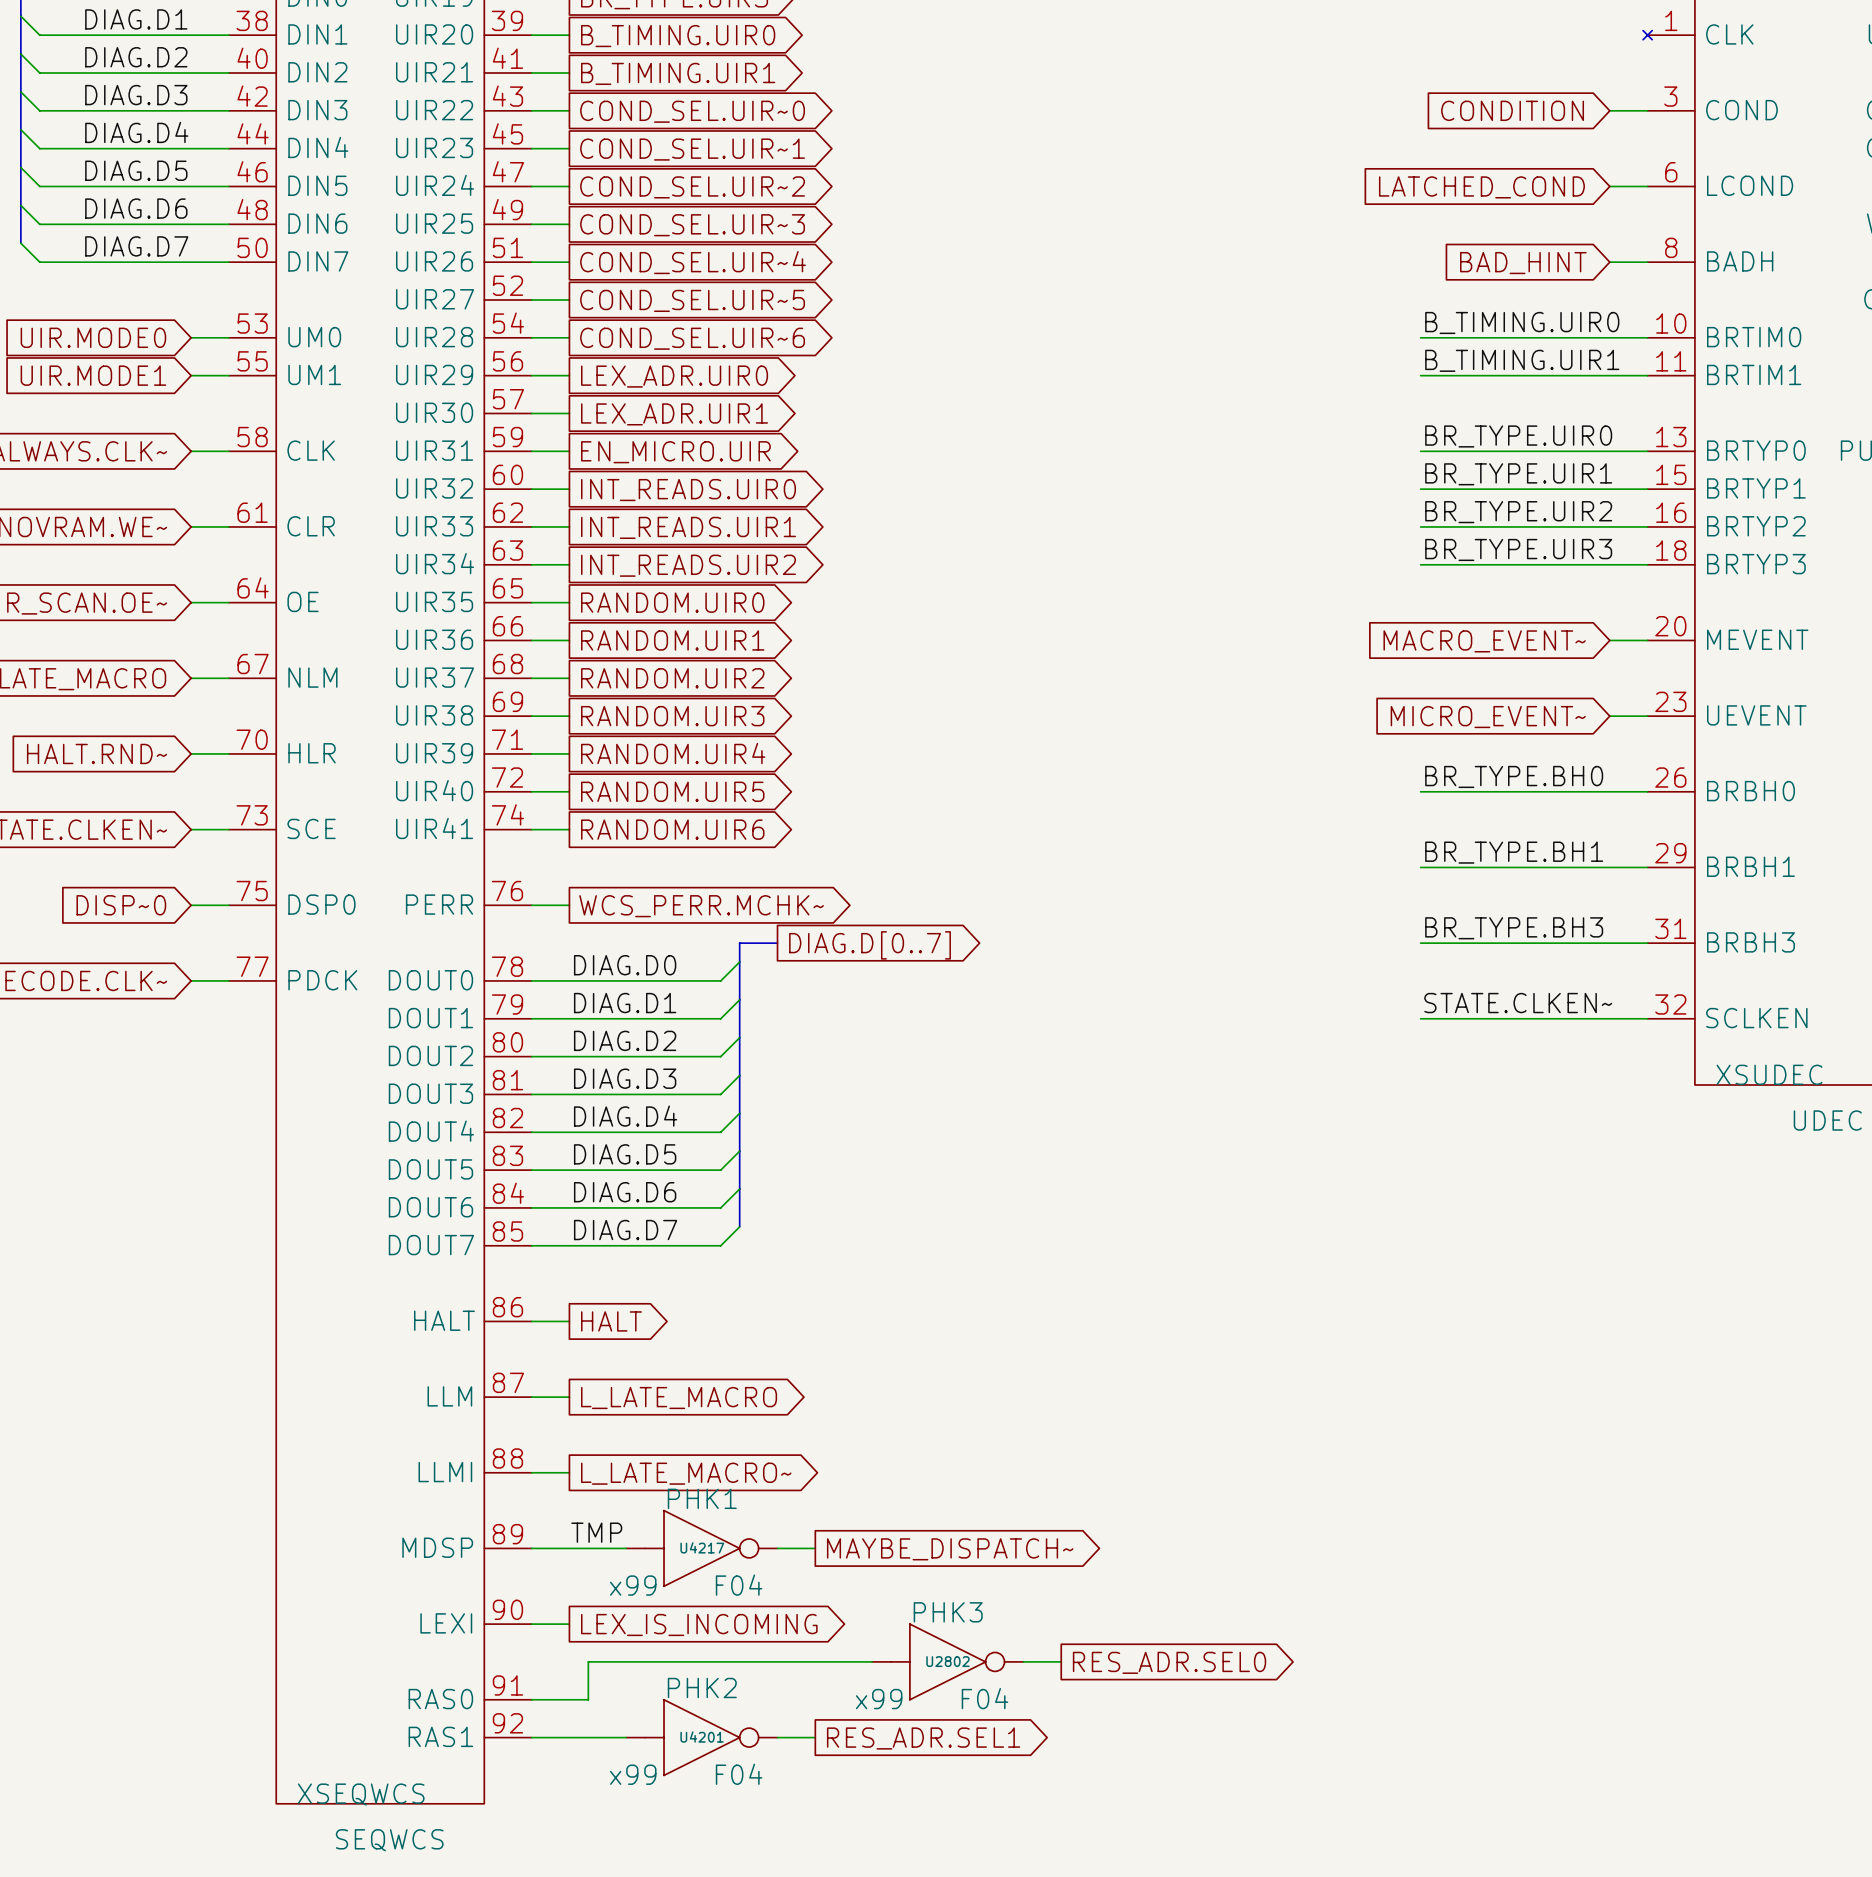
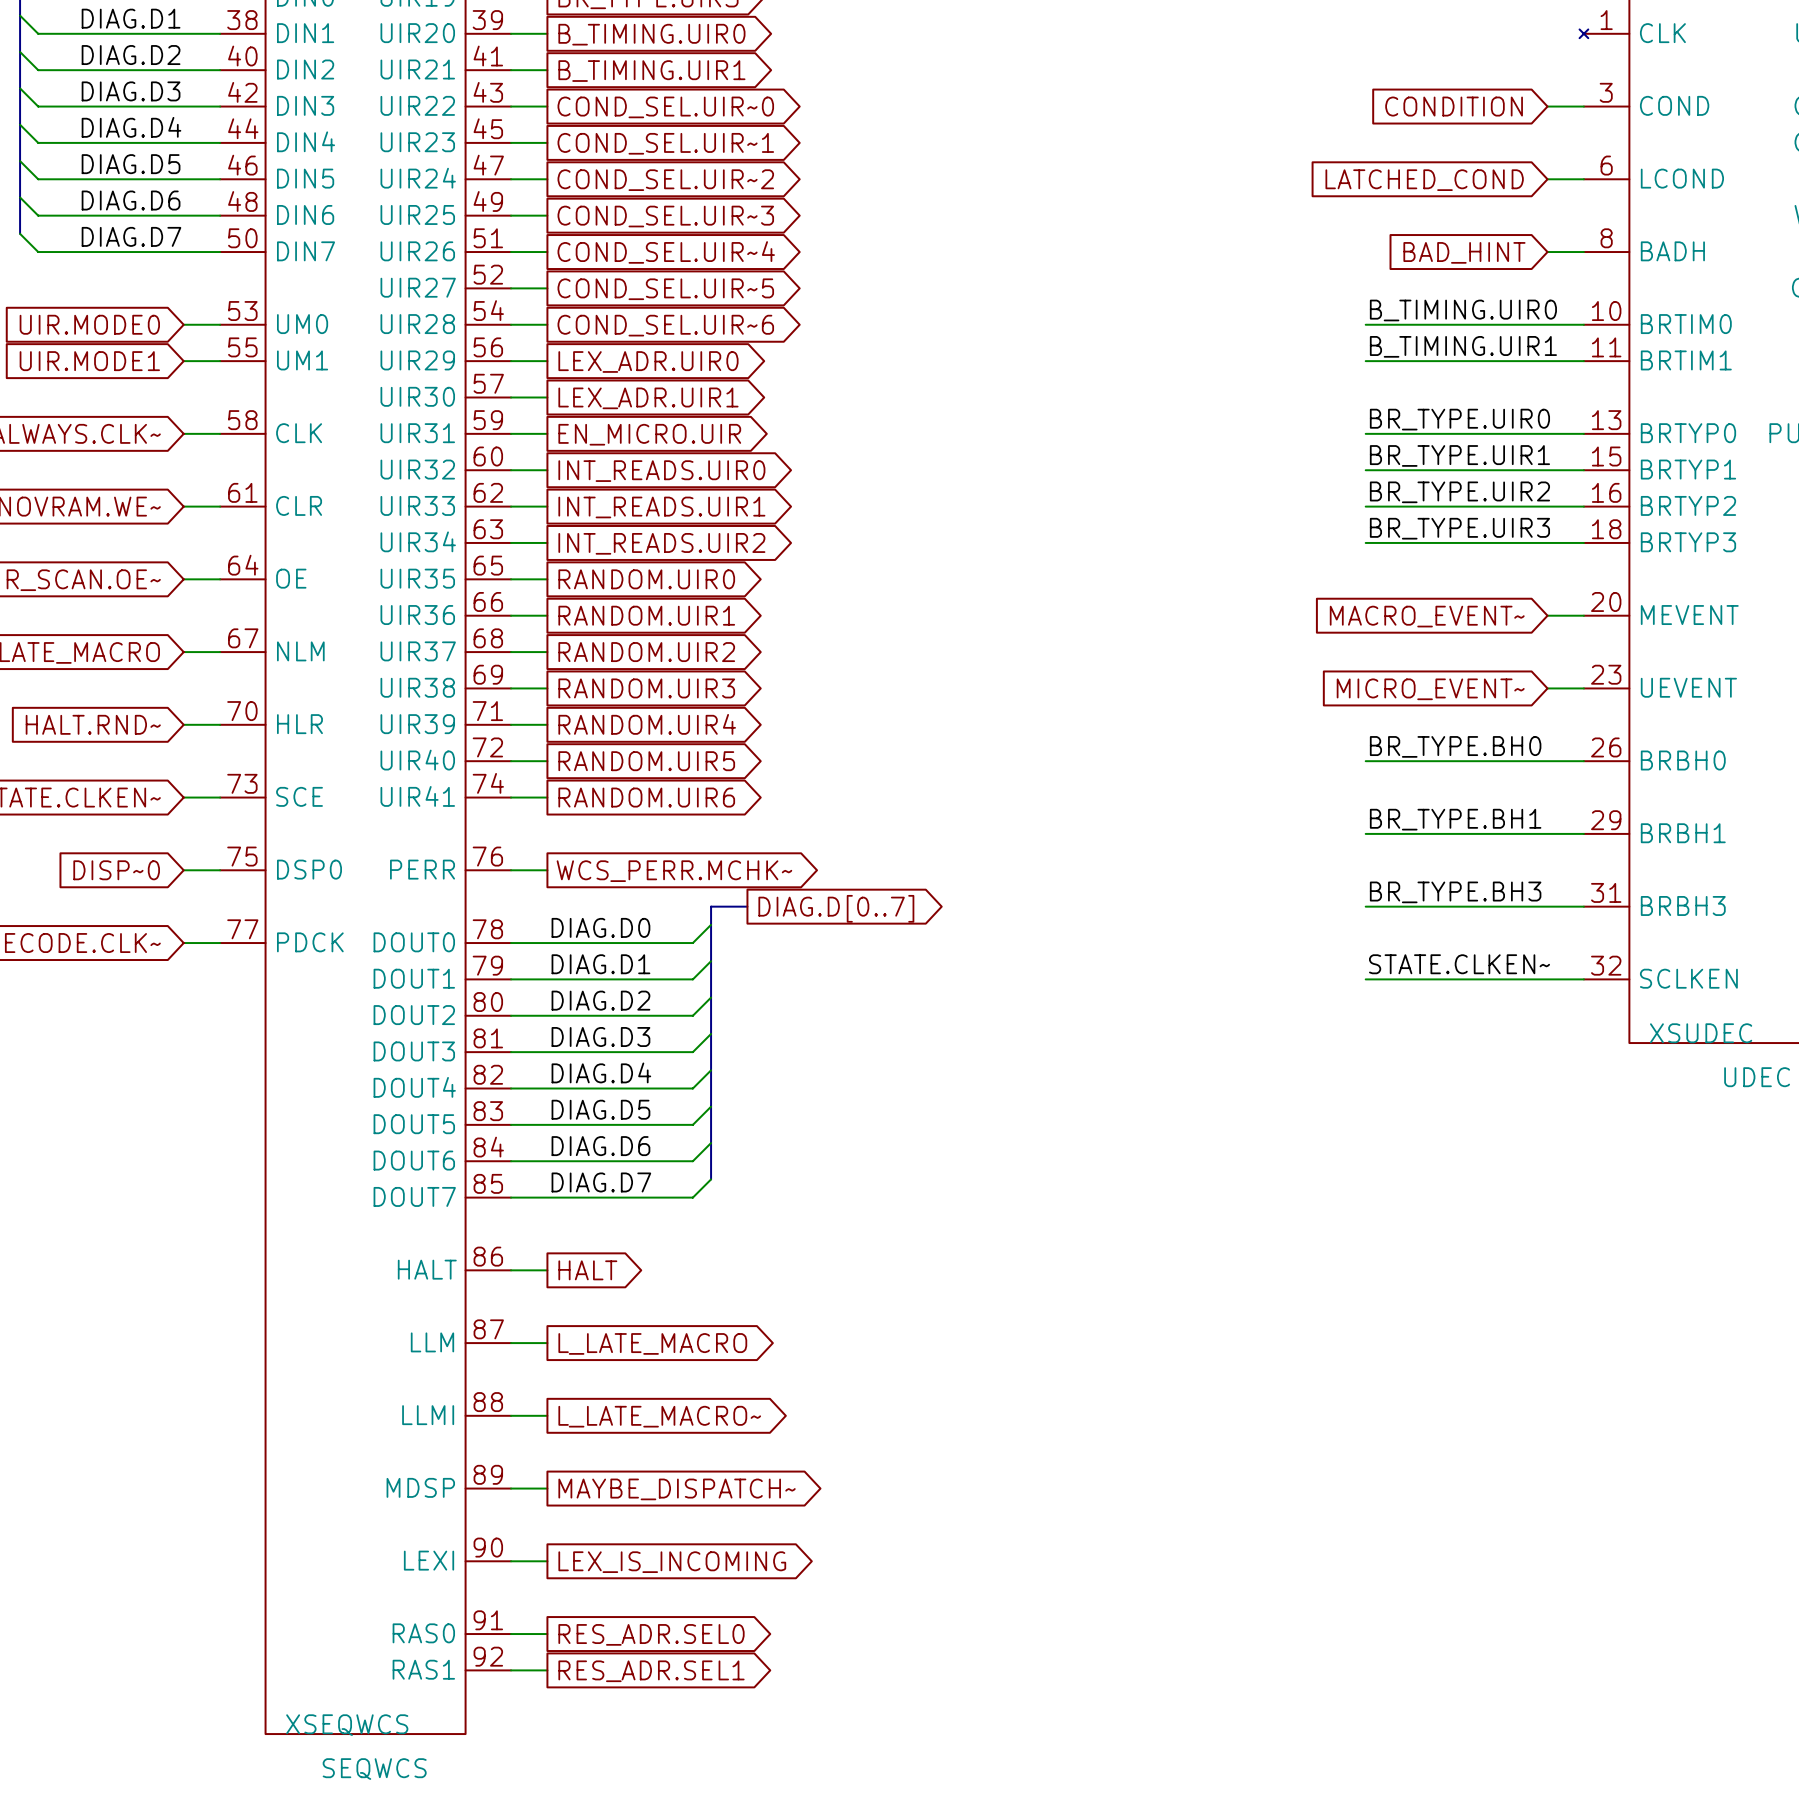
label: TMP (596, 1532) -> none
wire: (569, 1548) (626, 1548) -> none
U4217: F04 (701, 1548) -> none
wire: (777, 1548) (815, 1548) -> none
global label: none -> MAYBE_DISPATCH~ (677, 1489)
global label: MAYBE_DISPATCH~ (950, 1549) -> none
wire: (872, 1661) (588, 1661) (588, 1699) (569, 1699) -> none
U2802: F04 (947, 1661) -> none
wire: (1023, 1661) (1061, 1661) -> none
global label: RES_ADR.SEL0 (1169, 1662) -> none
global label: none -> RES_ADR.SEL0 (651, 1634)
wire: (569, 1737) (626, 1737) -> none
U4201: F04 (701, 1737) -> none
wire: (777, 1737) (815, 1737) -> none
global label: none -> RES_ADR.SEL1 (651, 1671)
global label: RES_ADR.SEL1 (923, 1738) -> none

